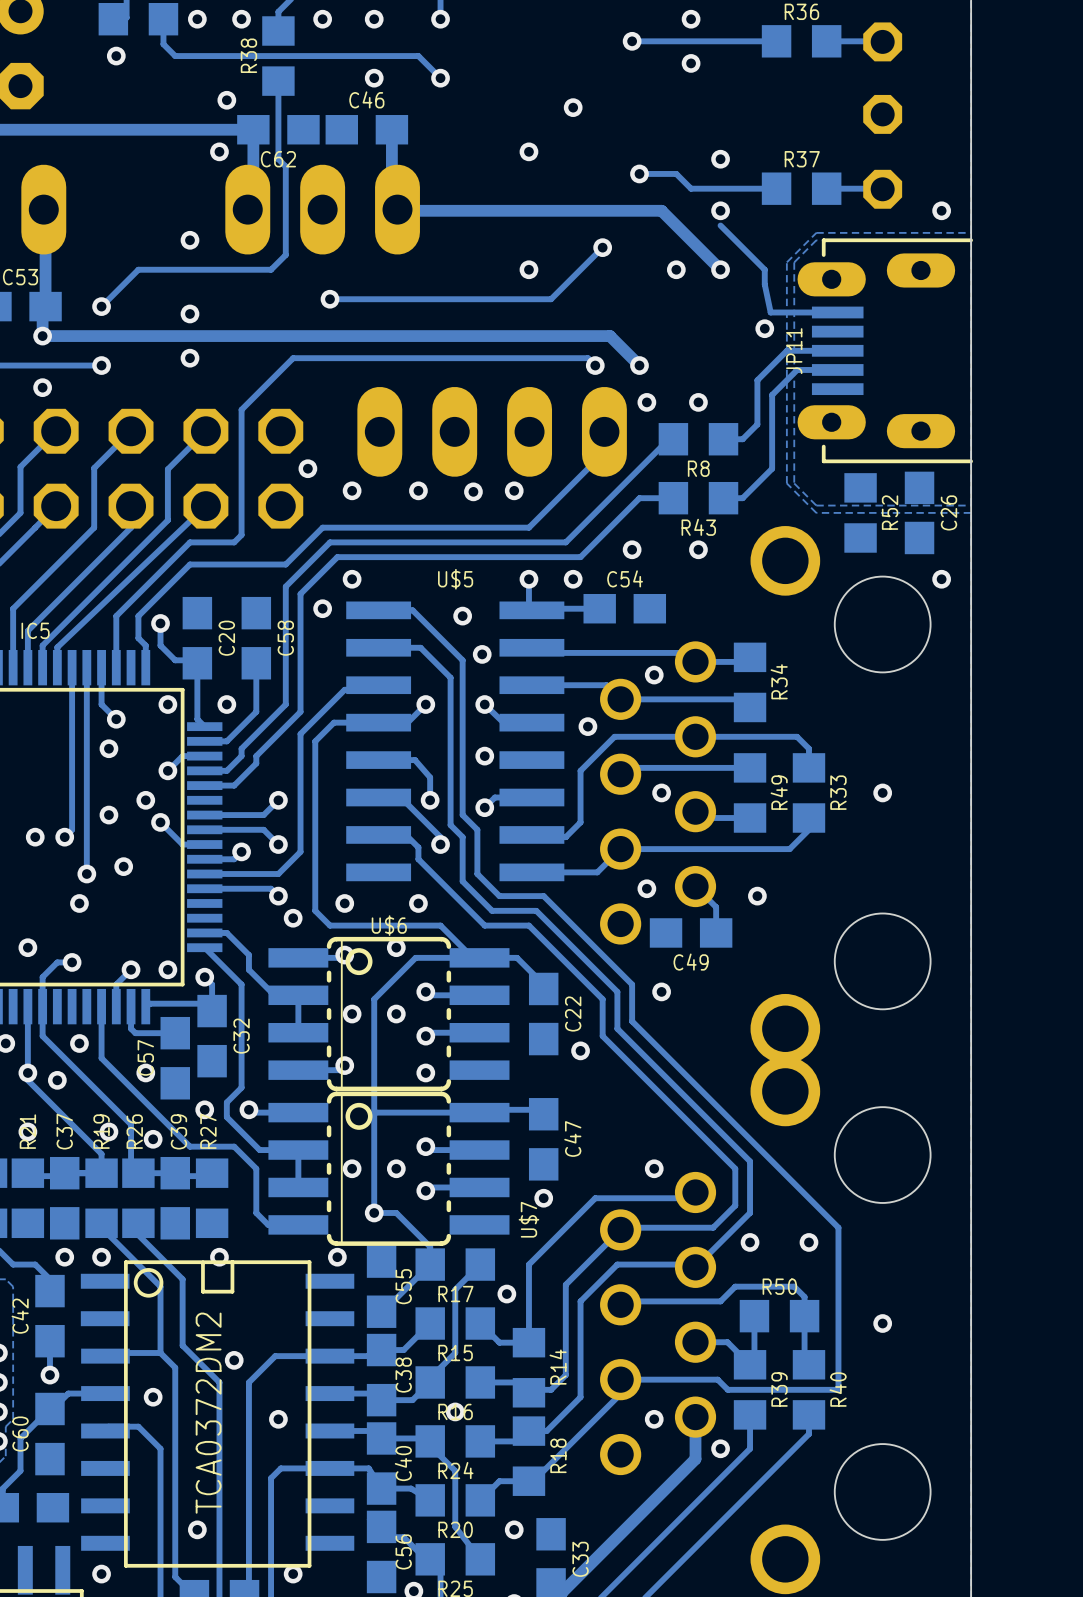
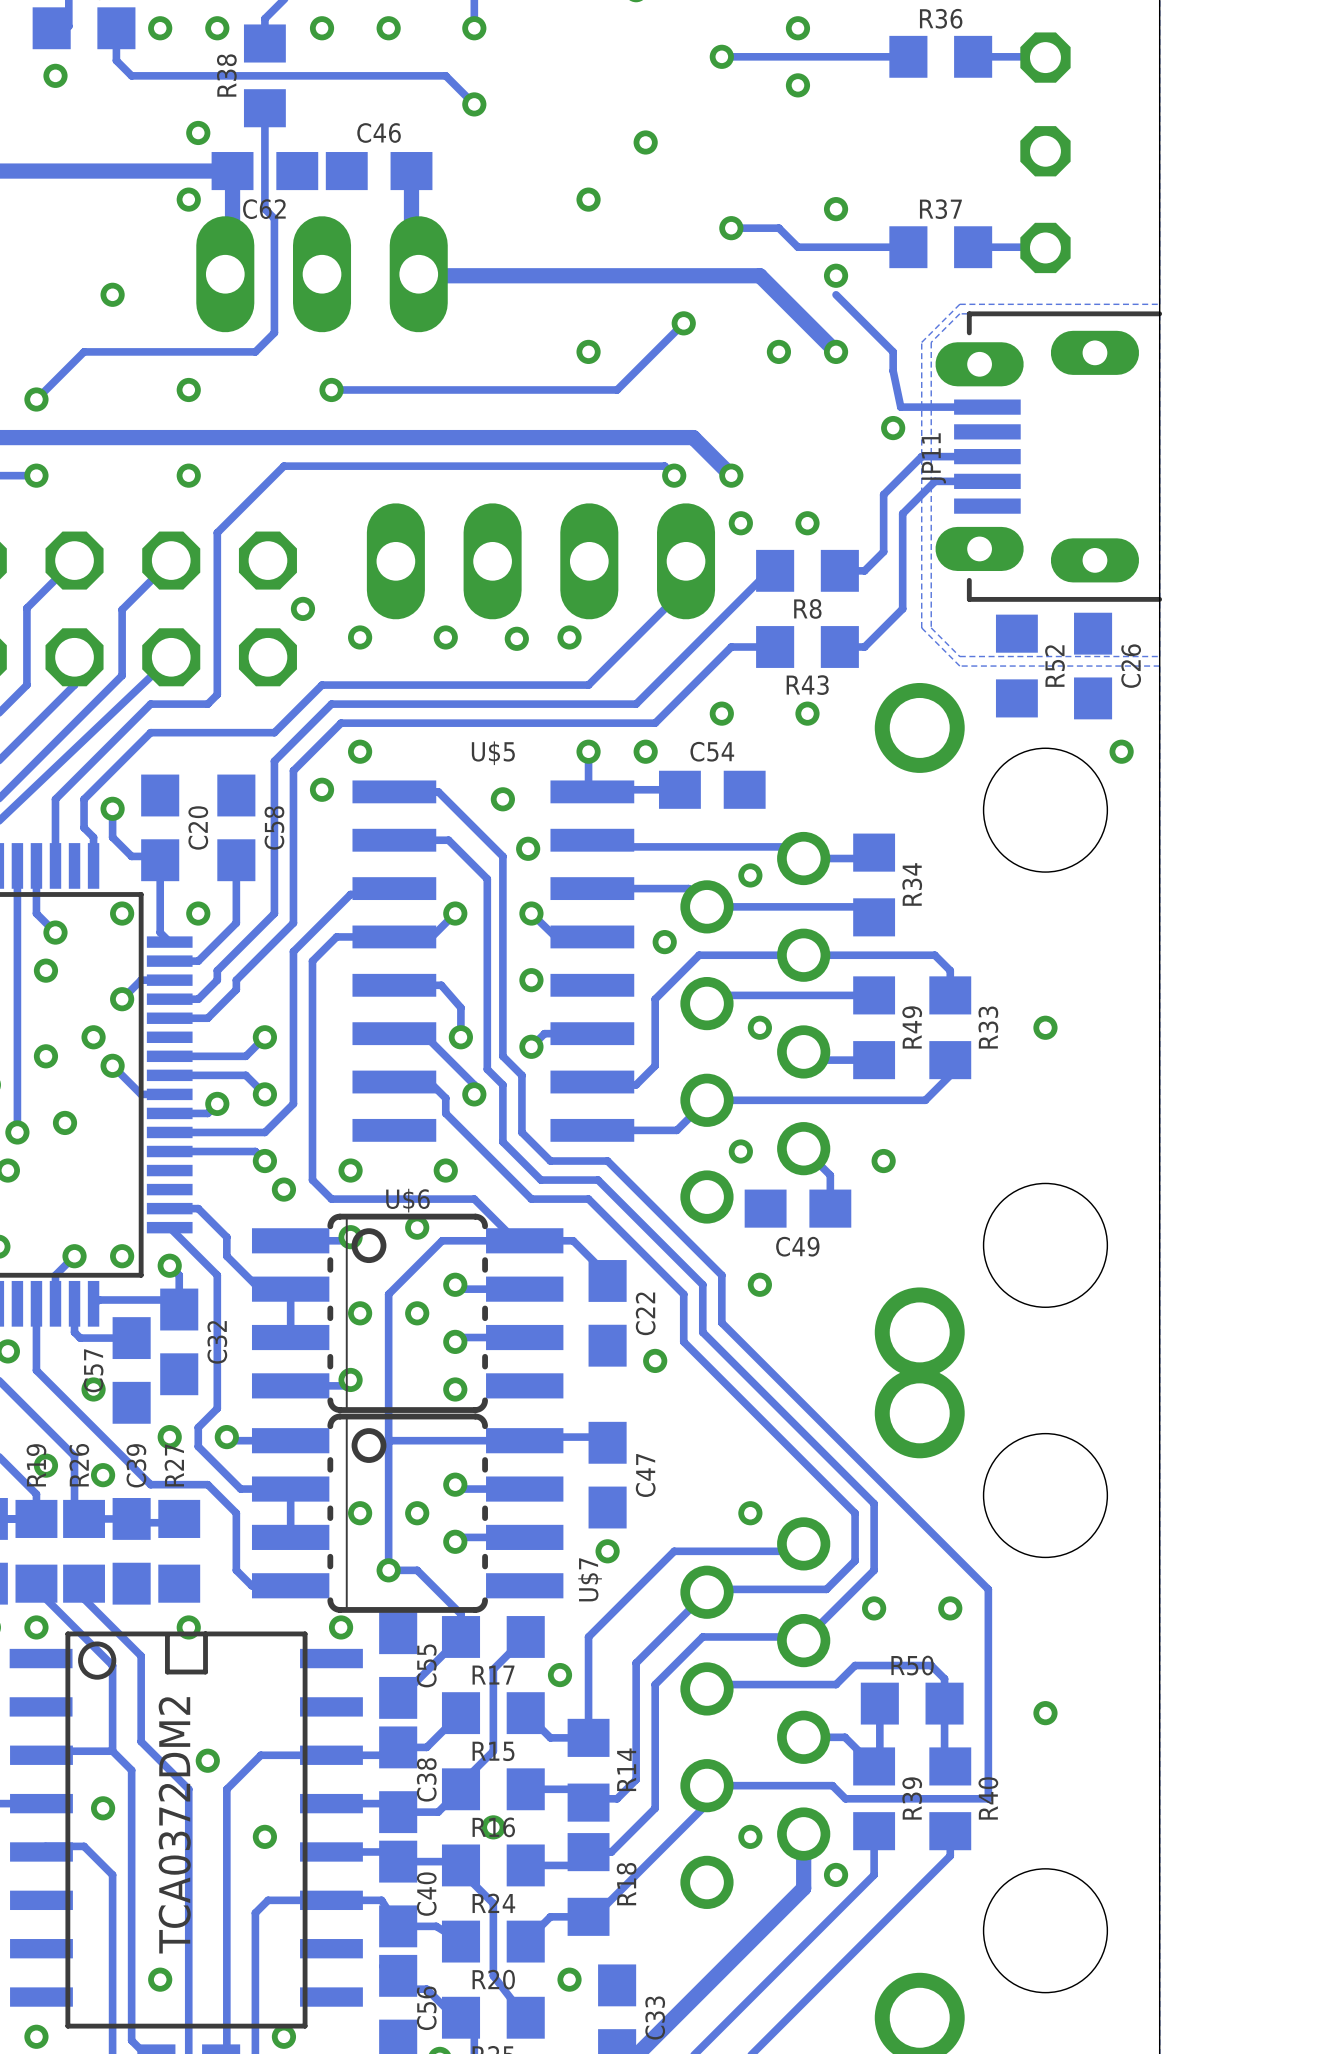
via: (374, 78) -> none
via: (941, 210) -> none
via: none -> (112, 294)
via: (189, 240) -> none
via: none -> (188, 389)
via: (189, 313) -> none
via: (189, 358) -> none
via: none -> (188, 475)

